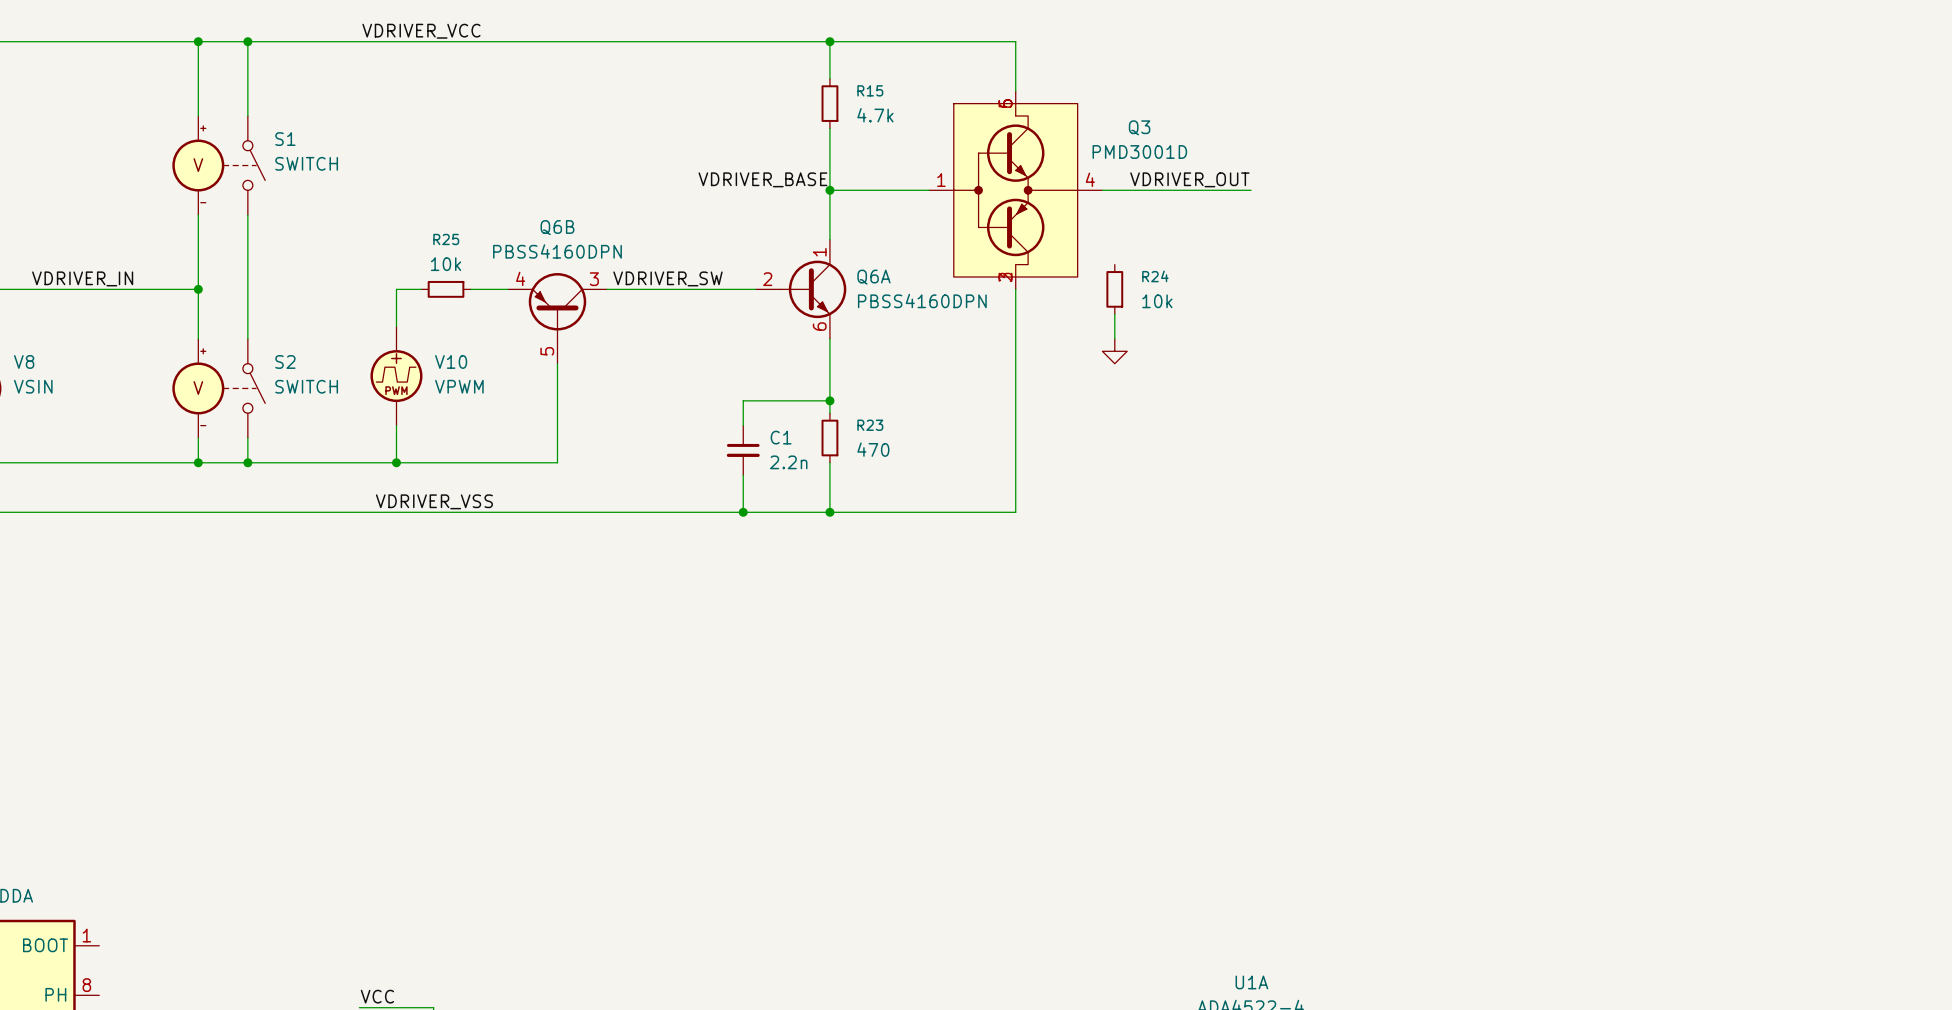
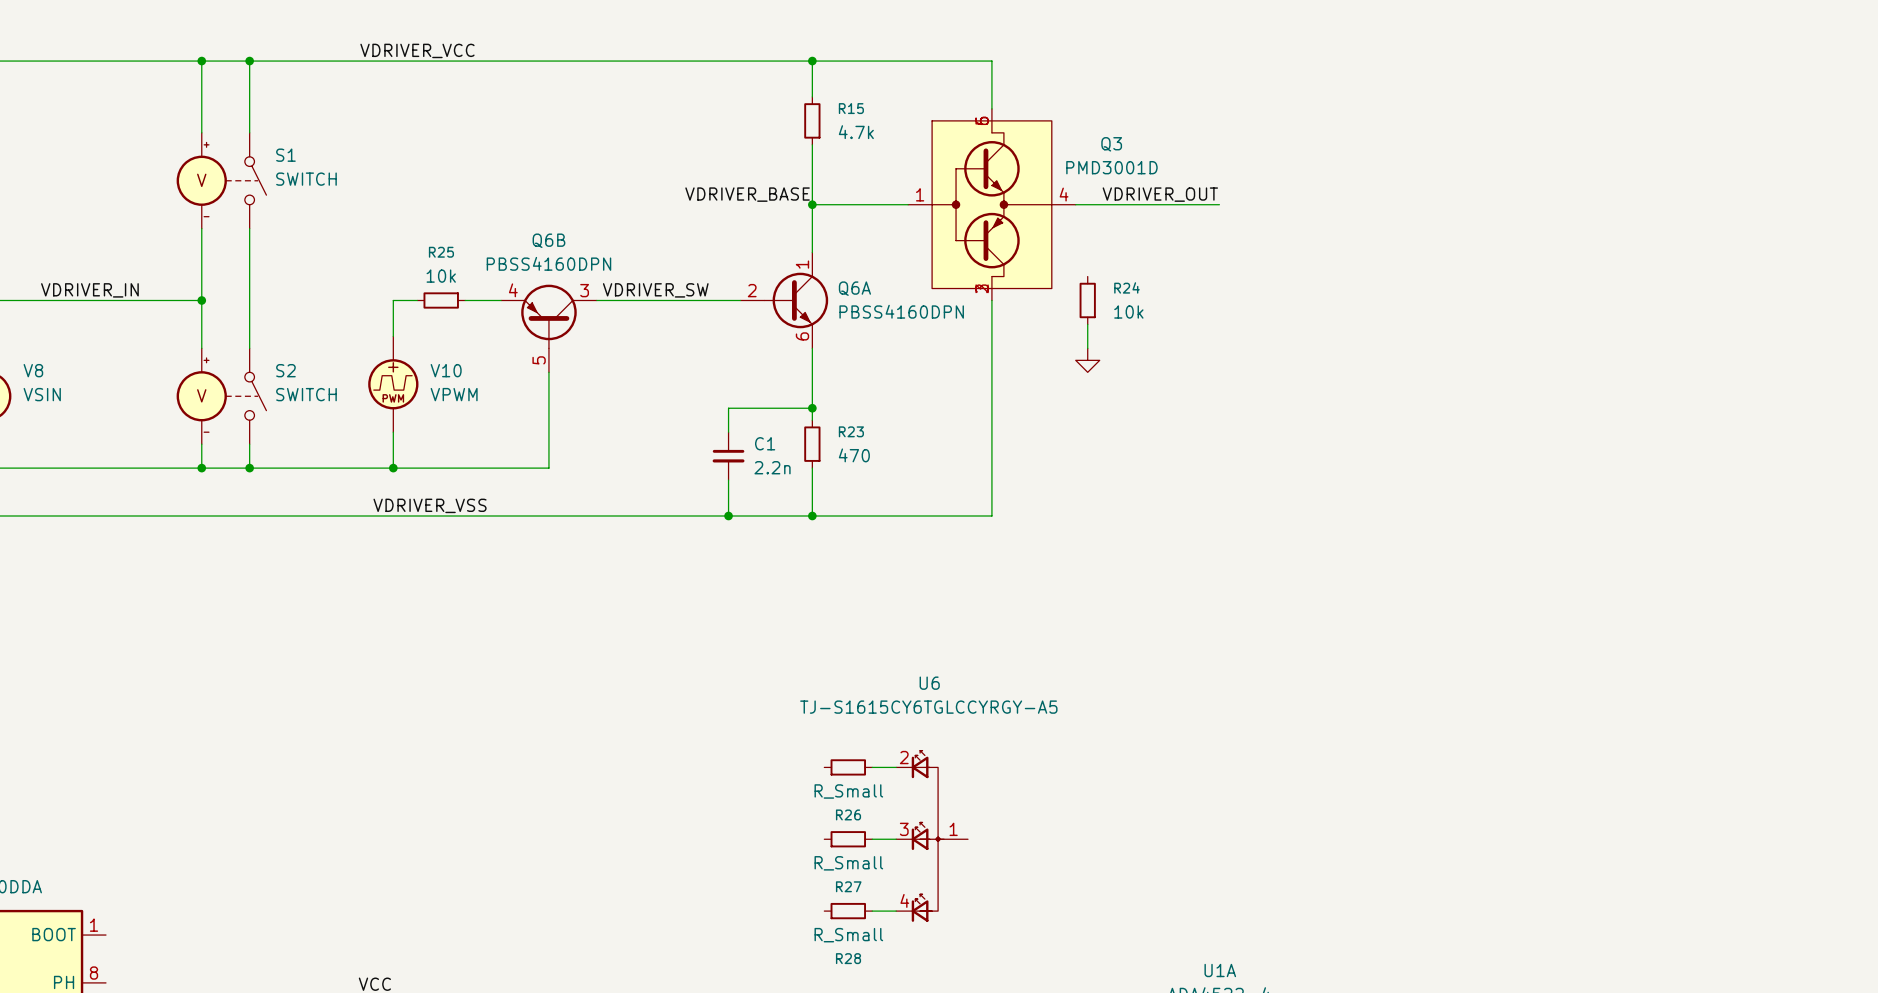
R26: none -> R_Small (848, 767)
wire: none -> (872, 767) (896, 767)
U6: none -> TJ-S1615CY6TGLCCYRGY-A5 (932, 836)
R27: none -> R_Small (848, 839)
wire: none -> (872, 839) (896, 839)
R28: none -> R_Small (848, 911)
wire: none -> (872, 911) (896, 911)

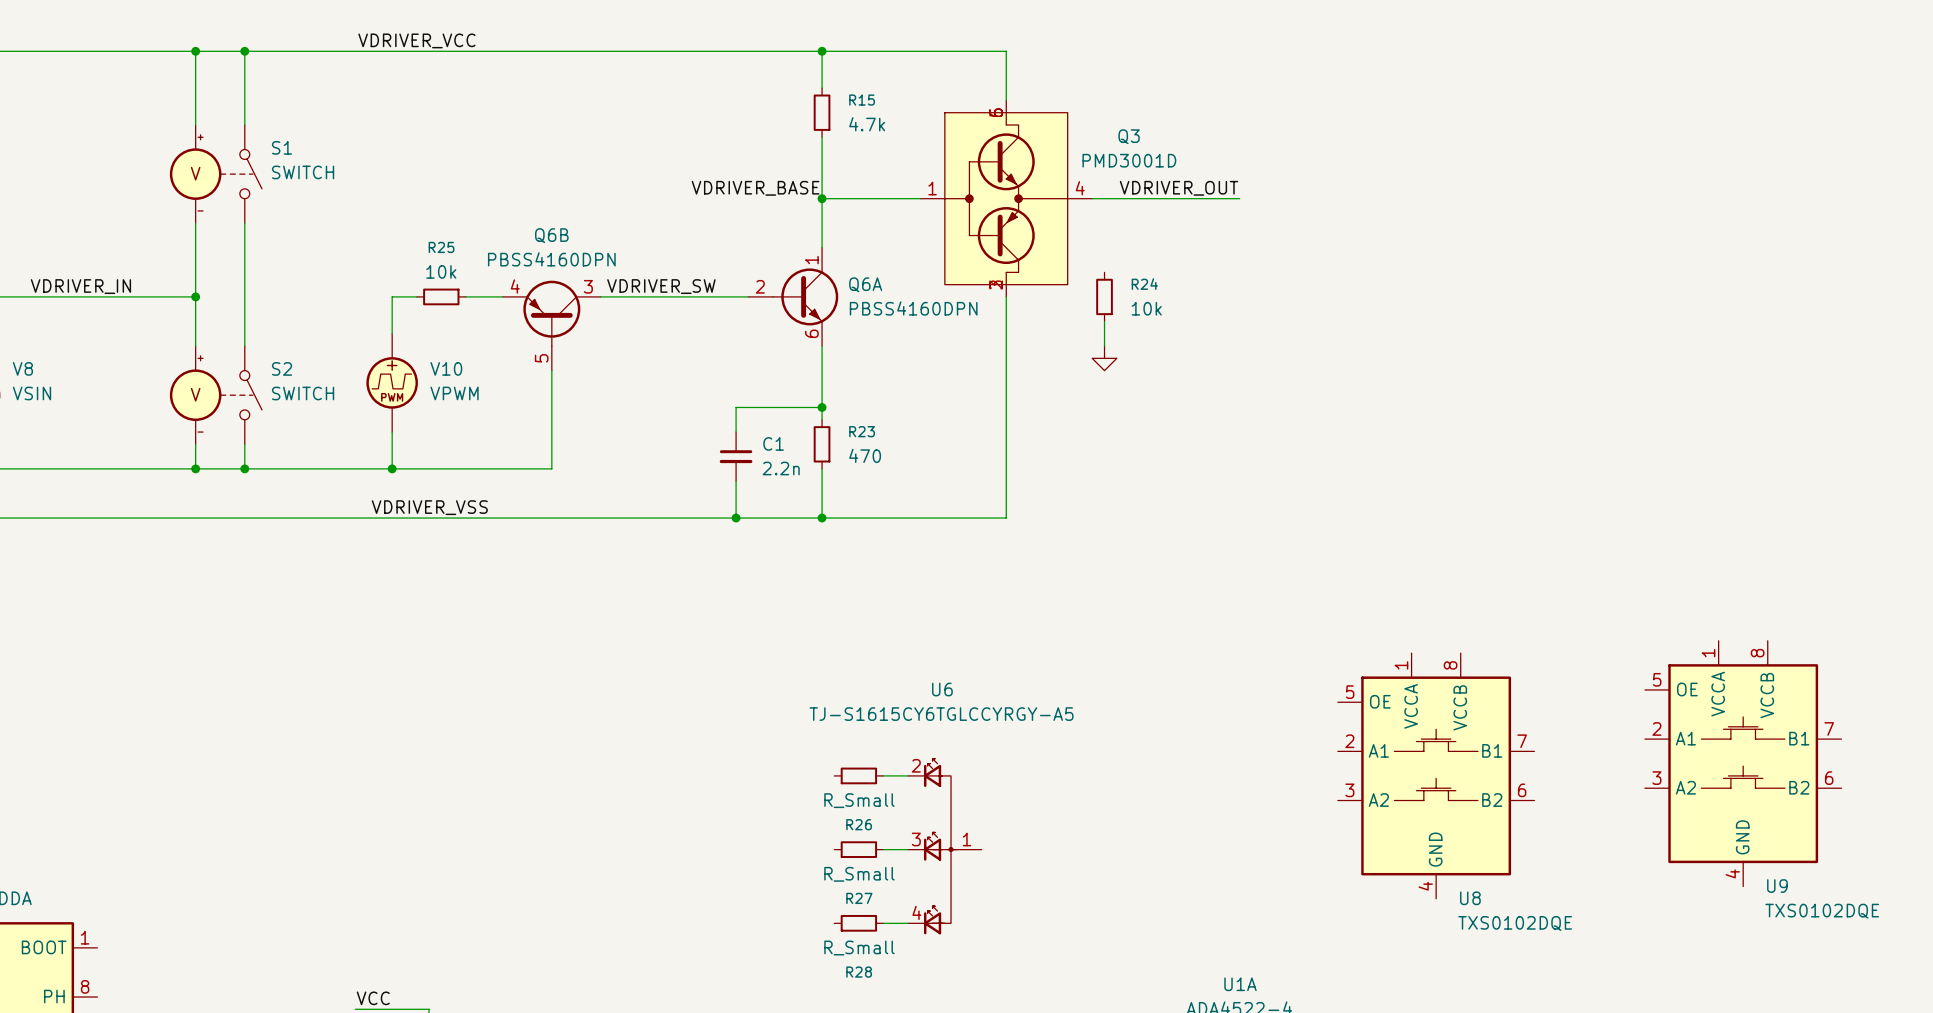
U9: none -> TXS0102DQE (1743, 763)
U8: none -> TXS0102DQE (1436, 775)

